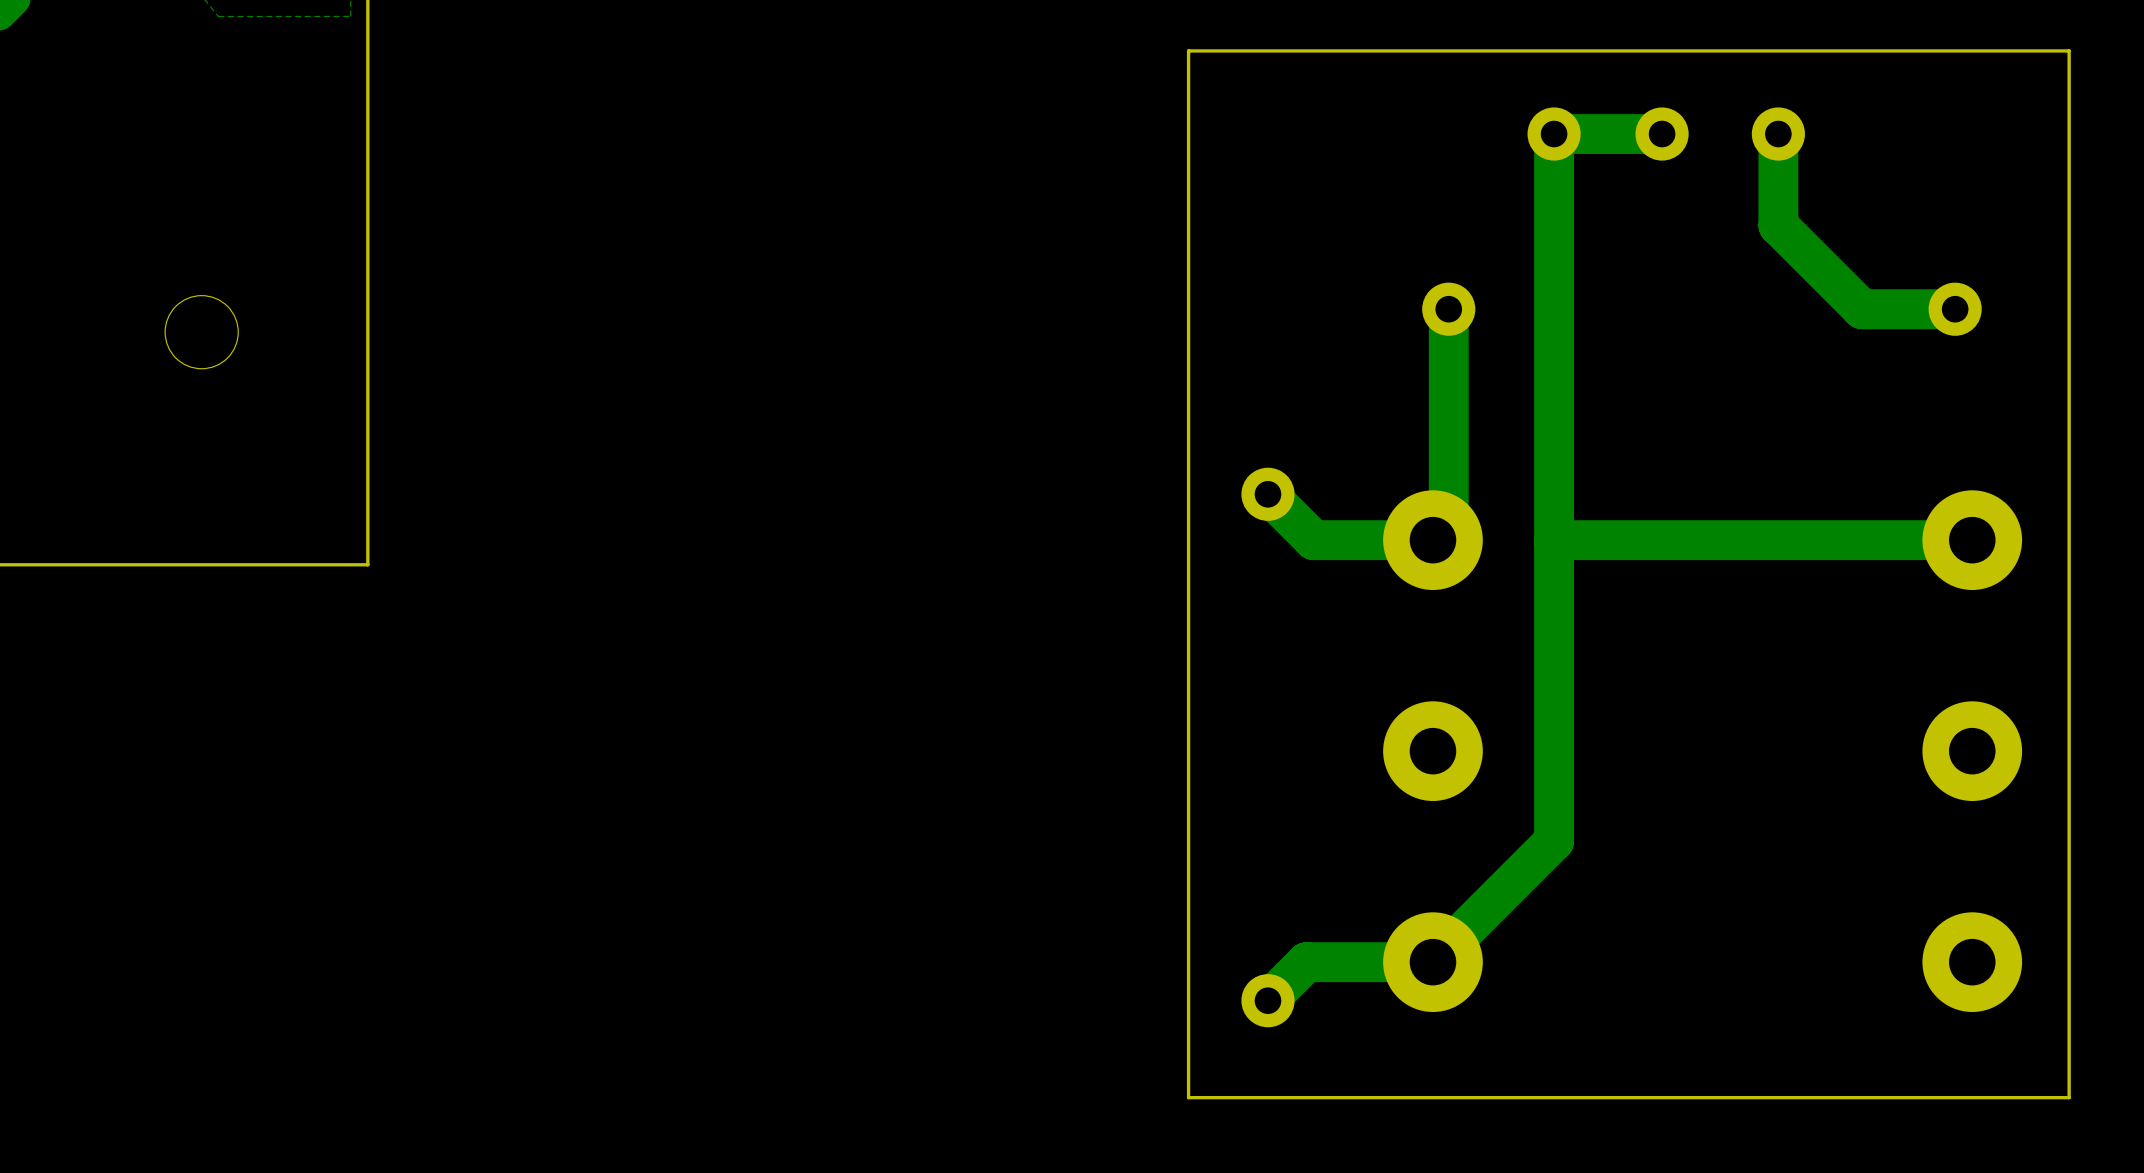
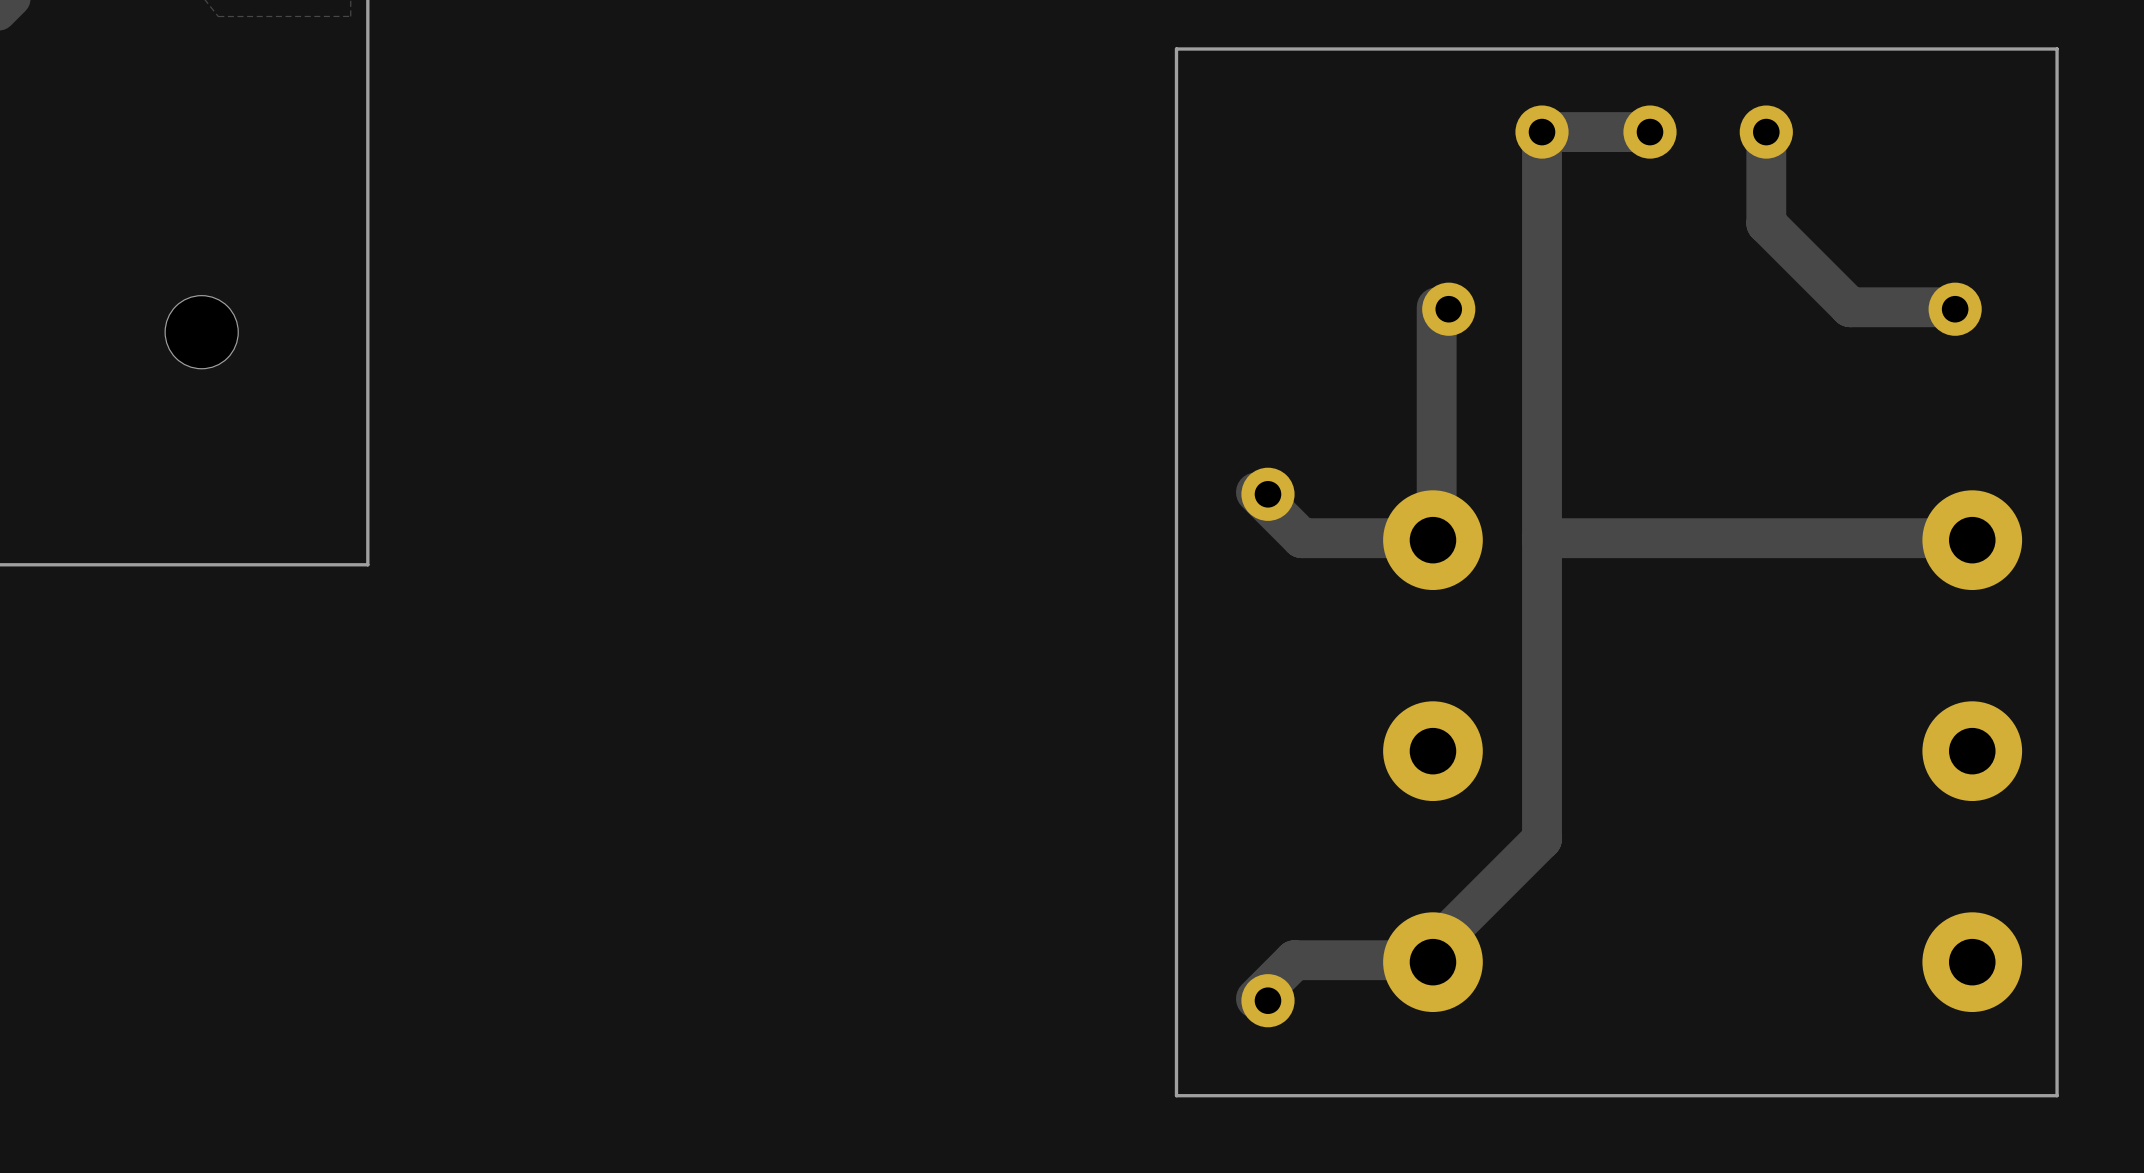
board edge: (2069, 50) (1188, 50) (1188, 1097) (2069, 1097) (2069, 50) -> (2057, 48) (1176, 48) (1176, 1095) (2057, 1095) (2057, 48)
part position: (1554, 134) -> (1542, 132)
track: (1662, 134) (1554, 134) (1554, 841) (1432, 962) (1306, 962) (1267, 1000) -> (1650, 132) (1542, 132) (1542, 839) (1420, 960) (1294, 960) (1255, 998)
part position: (1662, 134) -> (1650, 132)
track: (1778, 134) (1778, 225) (1862, 309) (1955, 309) -> (1766, 132) (1766, 223) (1850, 307) (1943, 307)
part position: (1778, 134) -> (1766, 132)
track: (1448, 309) (1448, 524) -> (1436, 307) (1436, 522)
track: (1267, 494) (1313, 540) (1432, 540) -> (1255, 492) (1301, 538) (1420, 538)
track: (1972, 540) (1554, 541) -> (1960, 538) (1542, 539)

